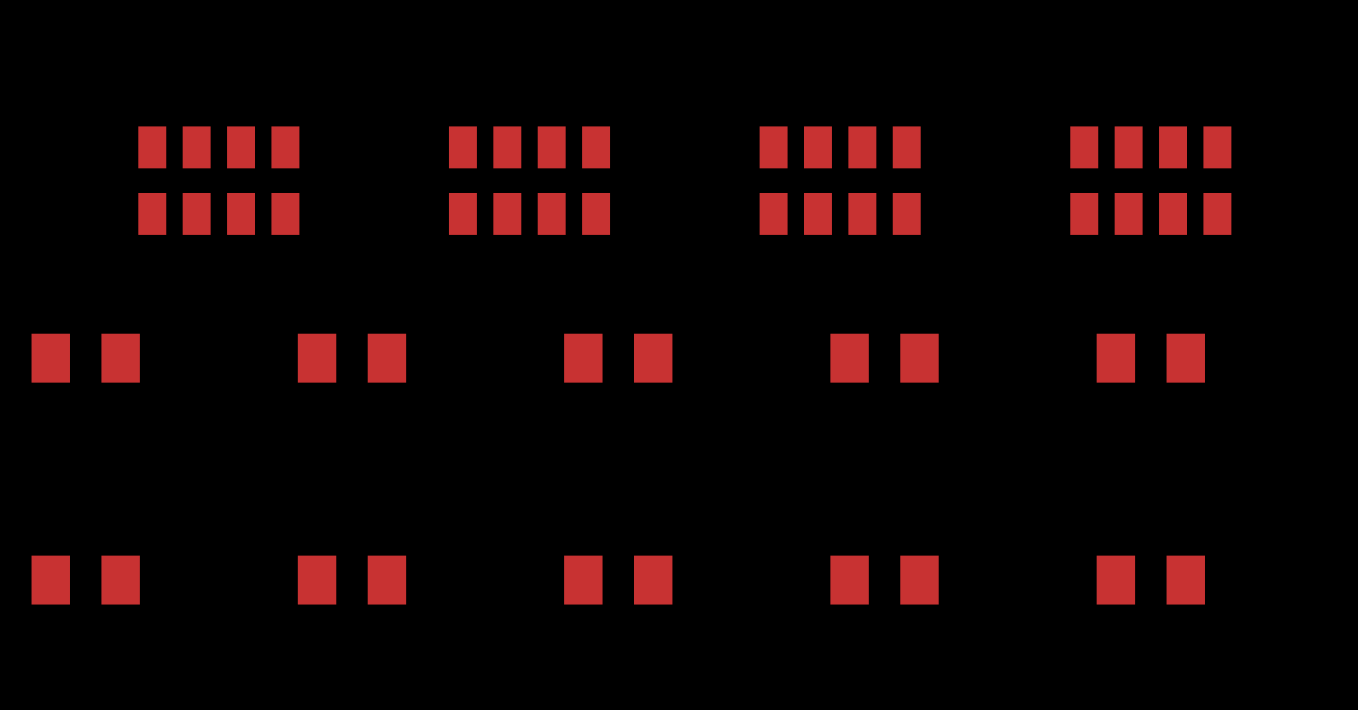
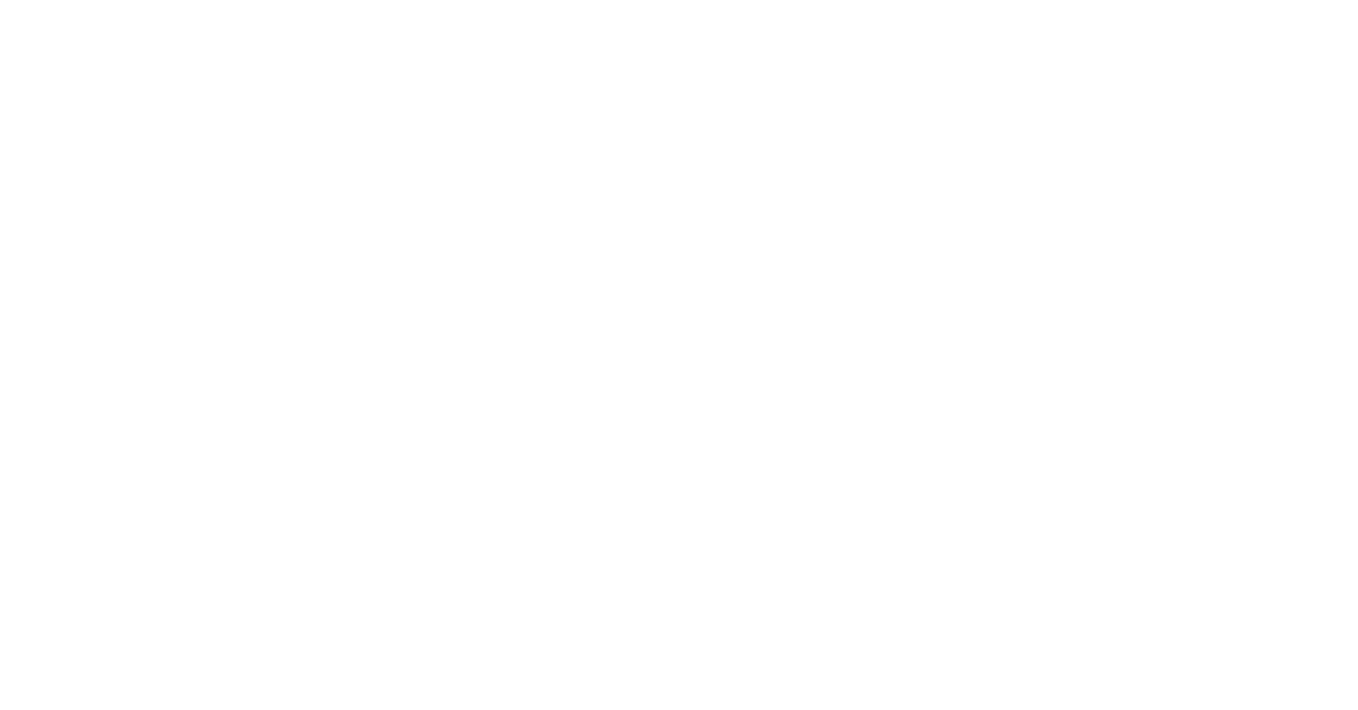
part: (218, 180) -> none
part: (529, 180) -> none
part: (840, 180) -> none
part: (1150, 180) -> none
part: (85, 358) -> none
part: (351, 358) -> none
part: (618, 358) -> none
part: (884, 358) -> none
part: (1150, 358) -> none
part: (85, 580) -> none
part: (351, 580) -> none
part: (618, 580) -> none
part: (884, 580) -> none
part: (1150, 580) -> none

